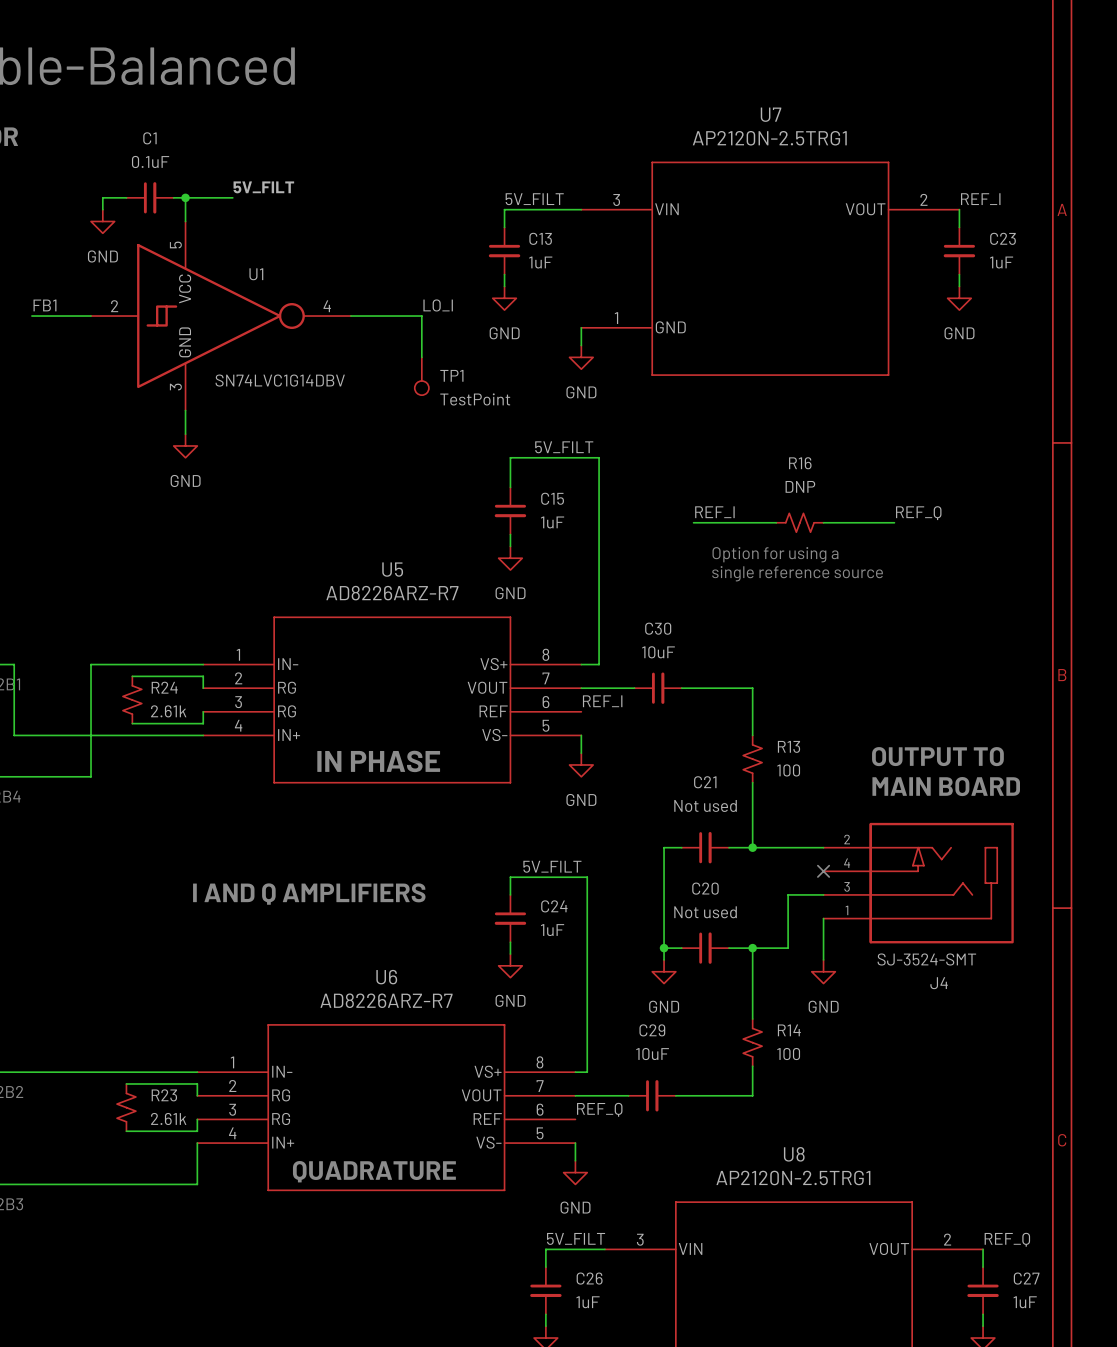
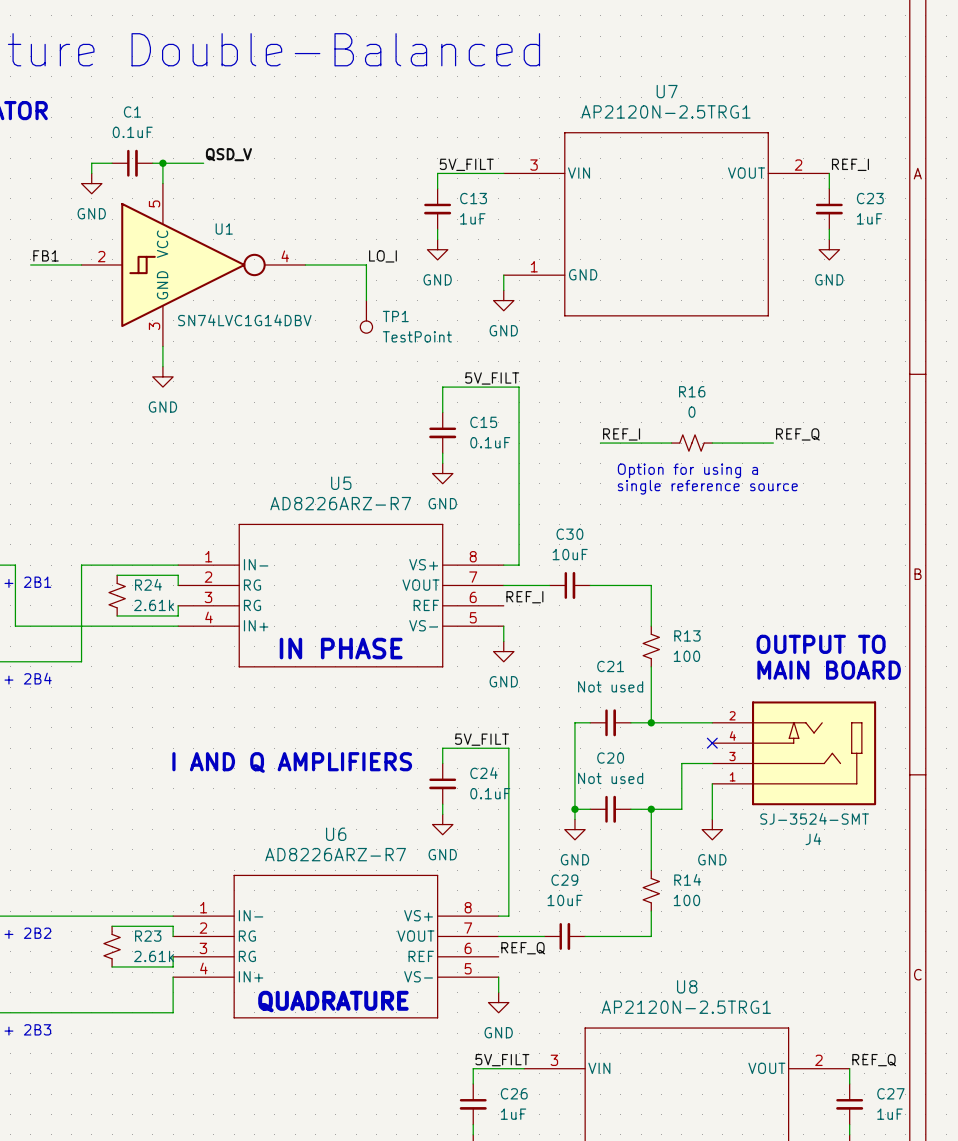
label: 5V_FILT (263, 187) -> QSD_V (228, 154)
R16 value: DNP (800, 486) -> 0 (691, 412)
C15 value: 1uF (552, 522) -> 0.1uF (490, 442)
C24 value: 1uF (552, 930) -> 0.1uF (490, 793)

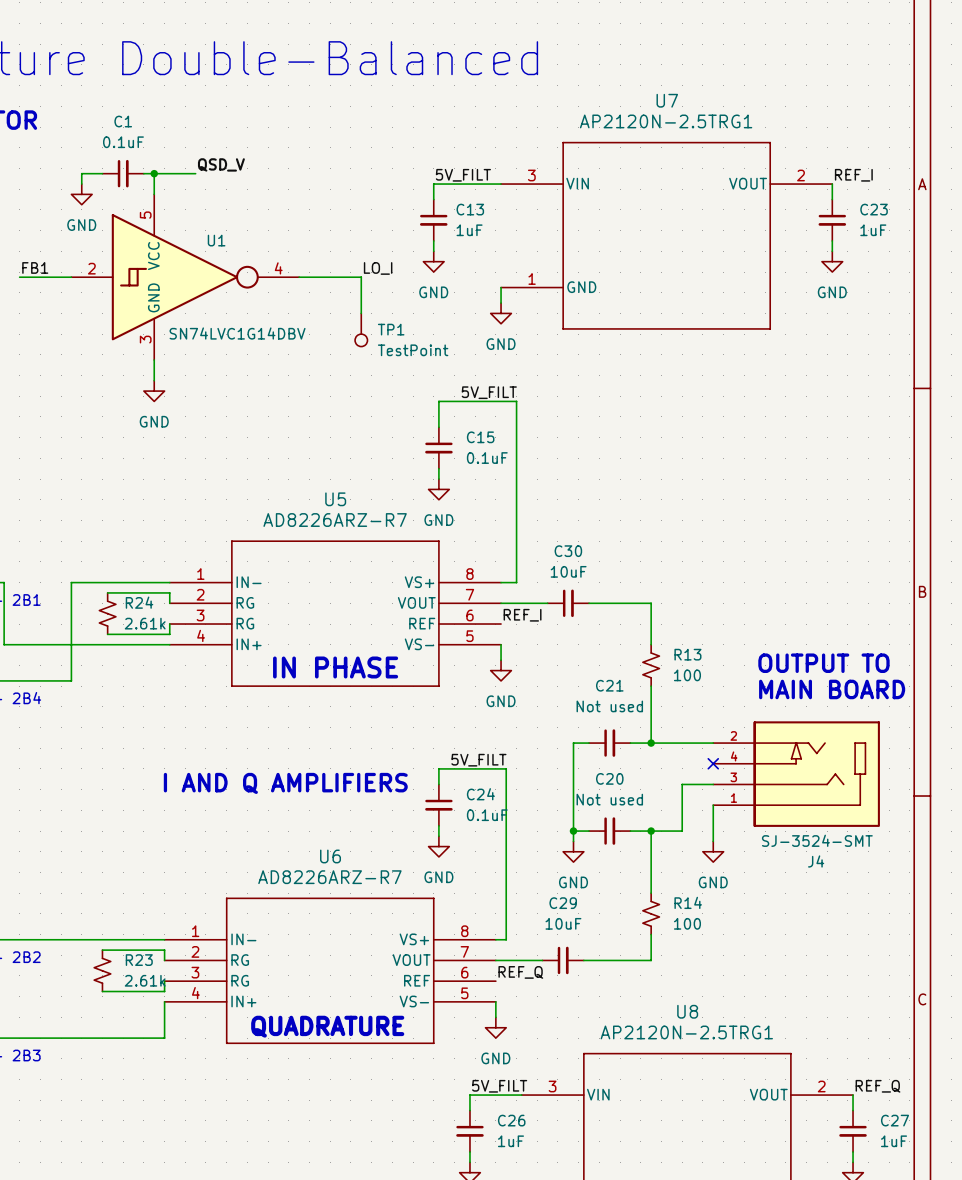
label: REF_I (621, 434) -> none
label: REF_Q (797, 434) -> none
wire: (600, 443) (671, 443) -> none
R16: 0 (691, 443) -> none
wire: (712, 443) (773, 443) -> none
text: Option for using a (687, 470) -> none
text: single reference source (707, 487) -> none

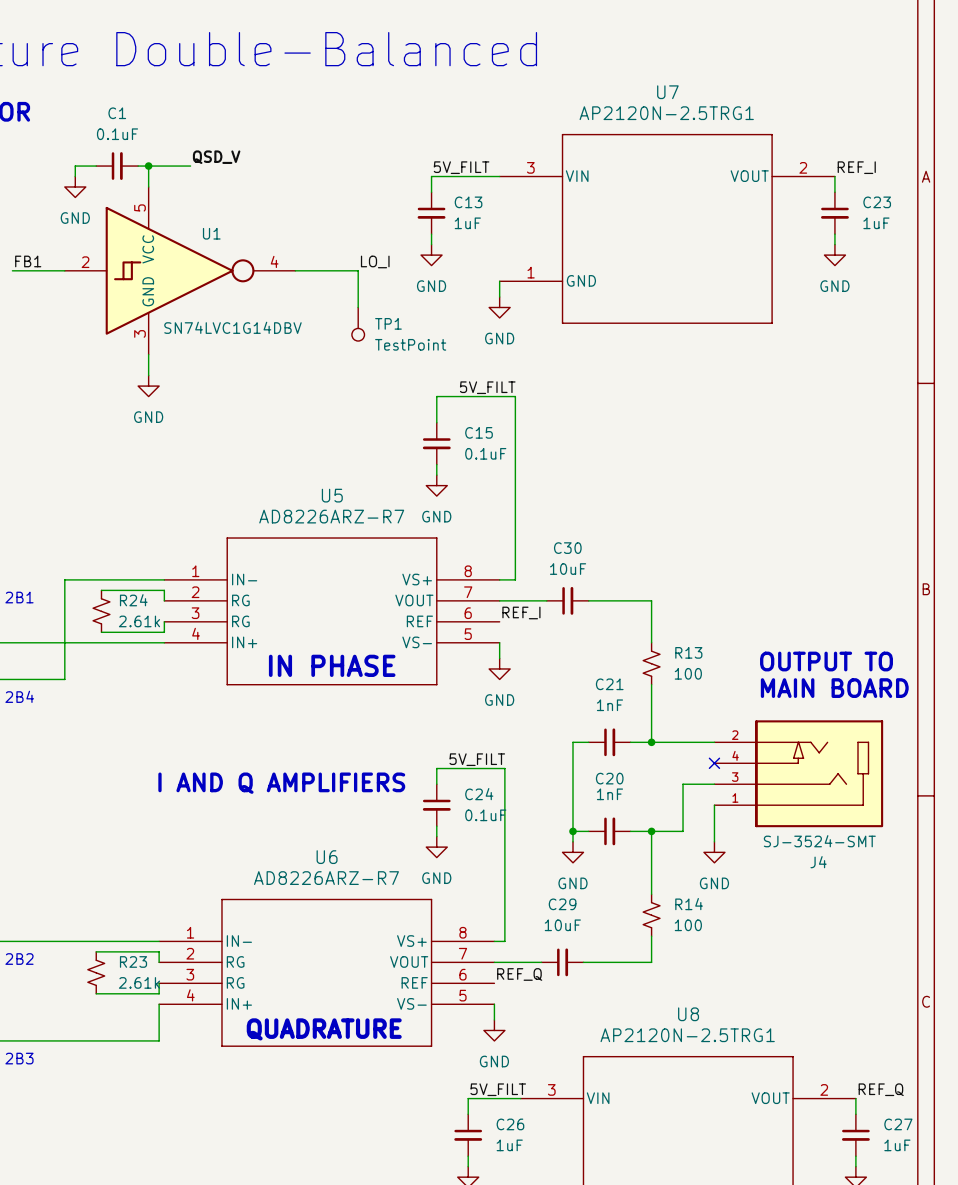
C21 value: Not used (609, 706) -> 1nF (609, 705)
C20 value: Not used (609, 799) -> 1nF (609, 794)

